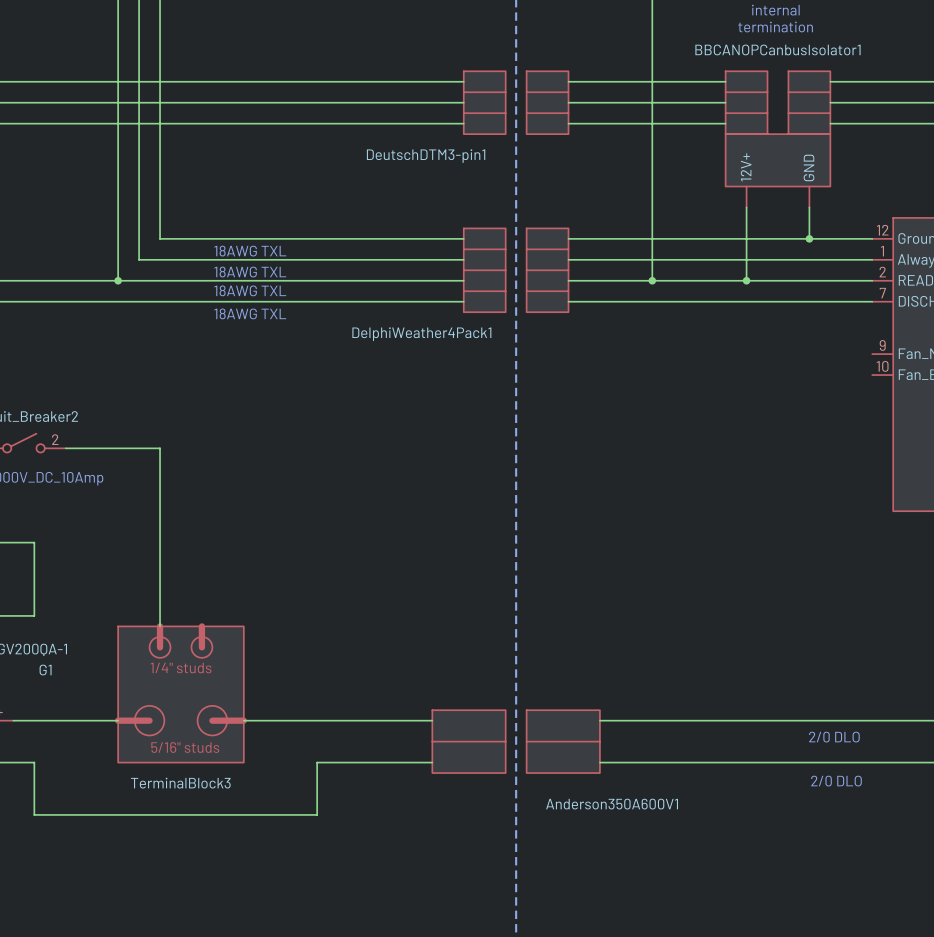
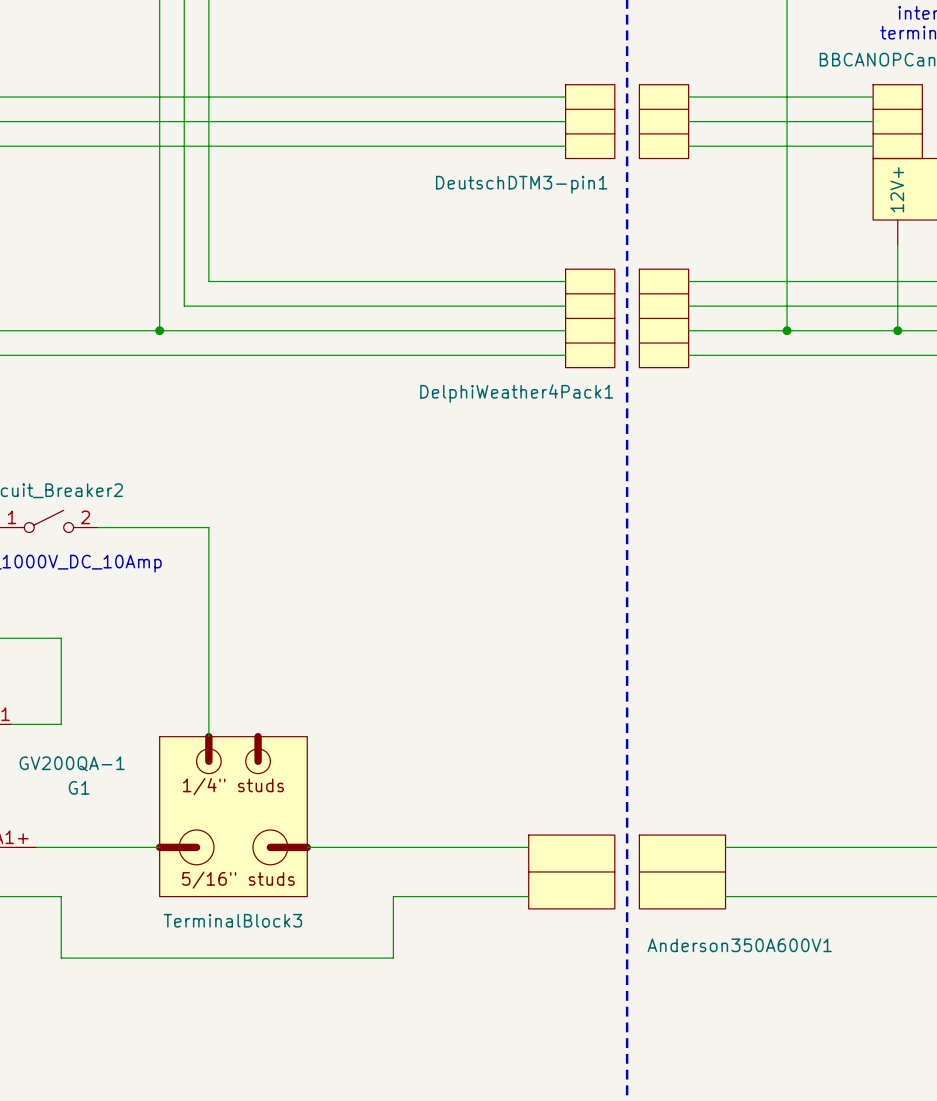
text: 18AWG TXL (250, 251) -> none
text: 18AWG TXL (250, 272) -> none
text: 18AWG TXL (250, 290) -> none
text: 18AWG TXL (250, 313) -> none

